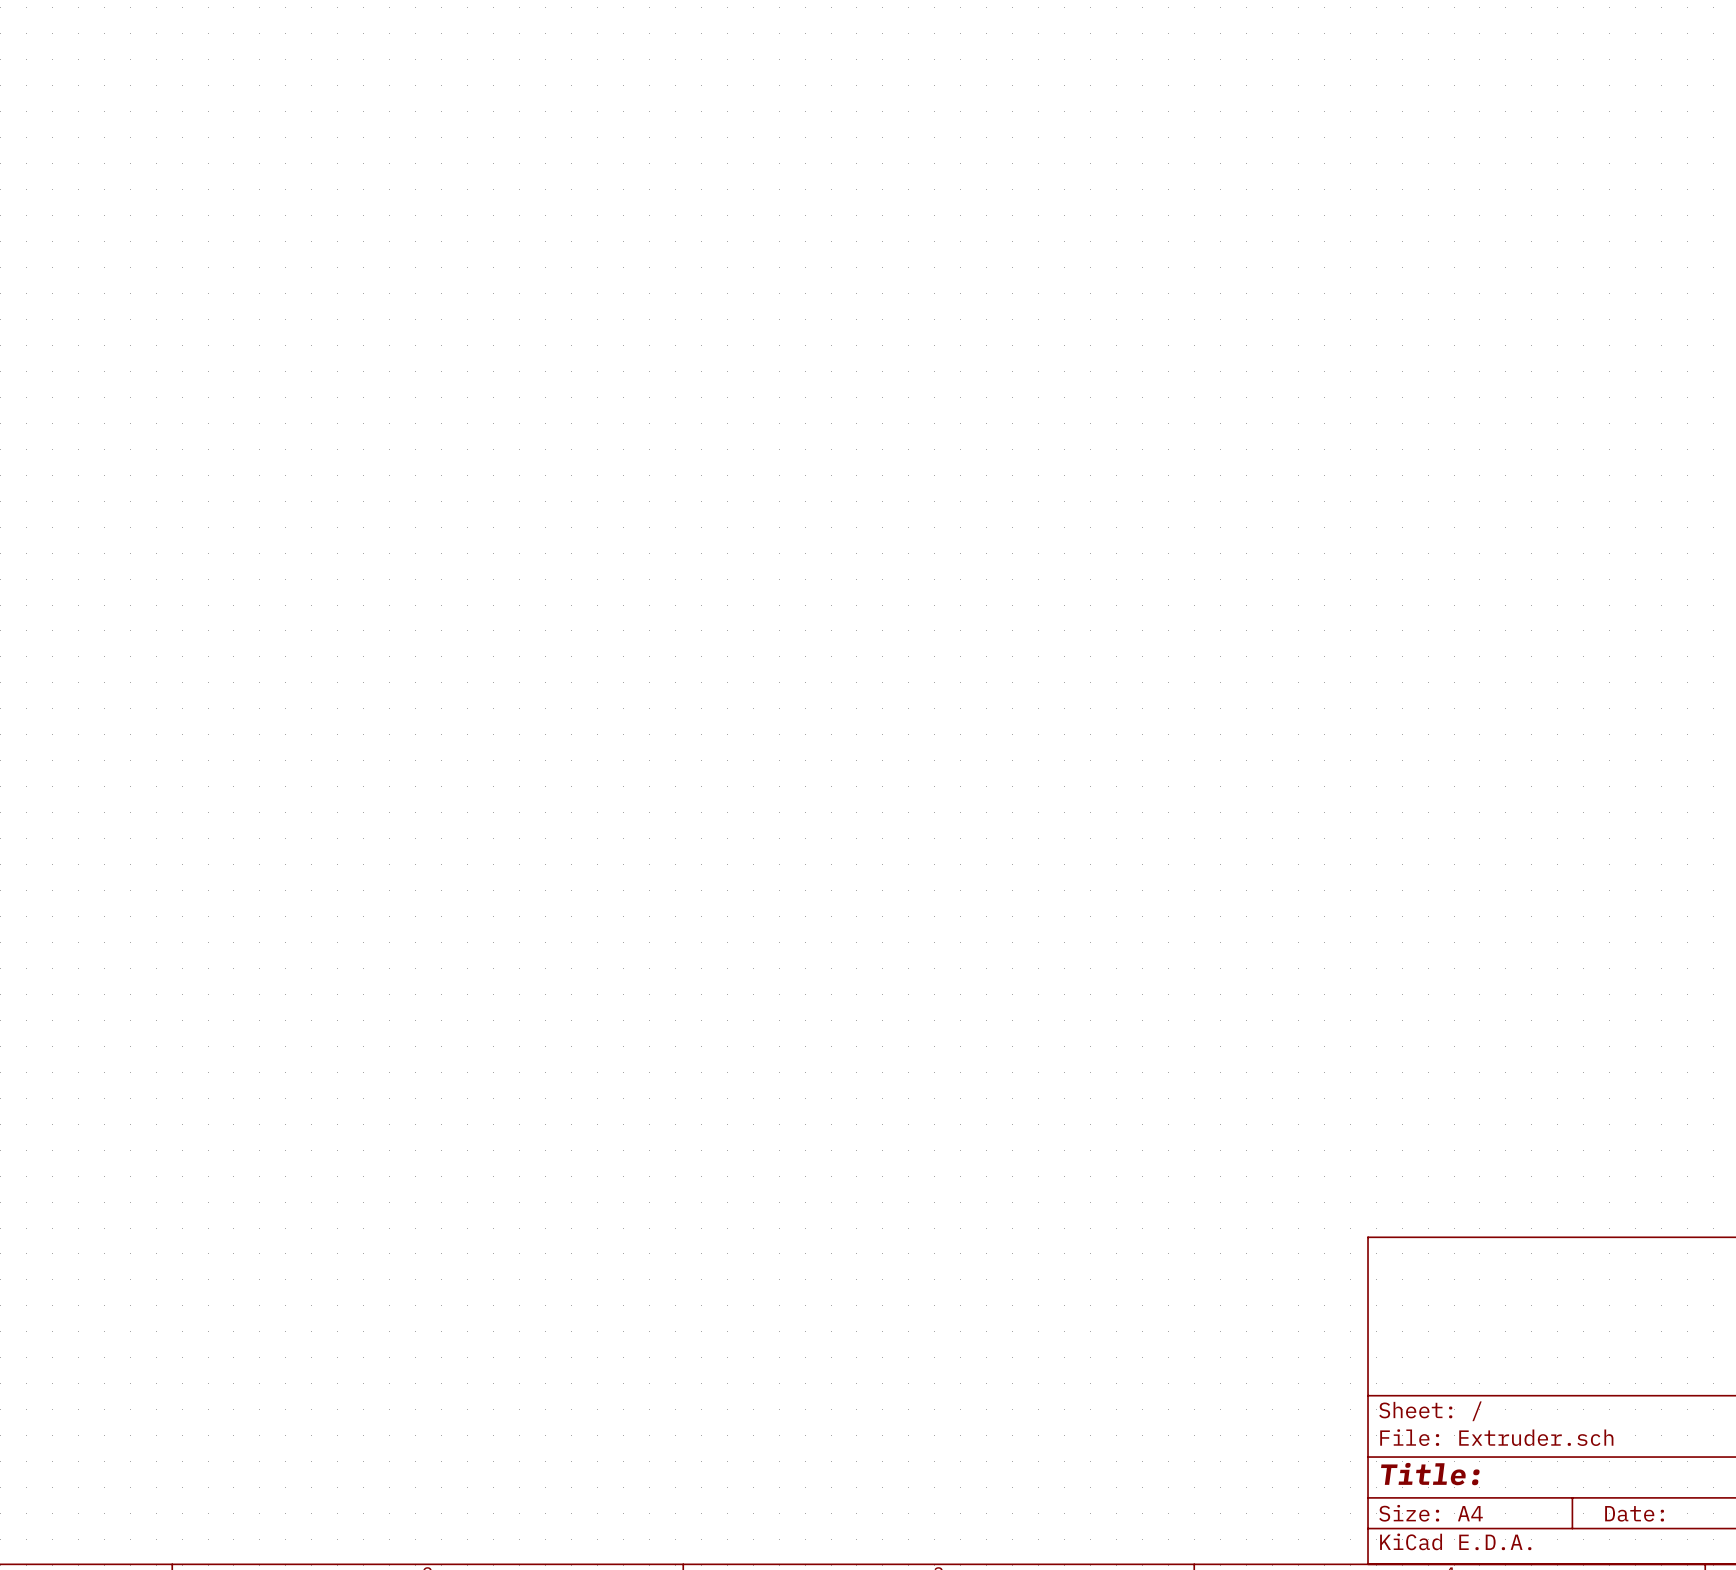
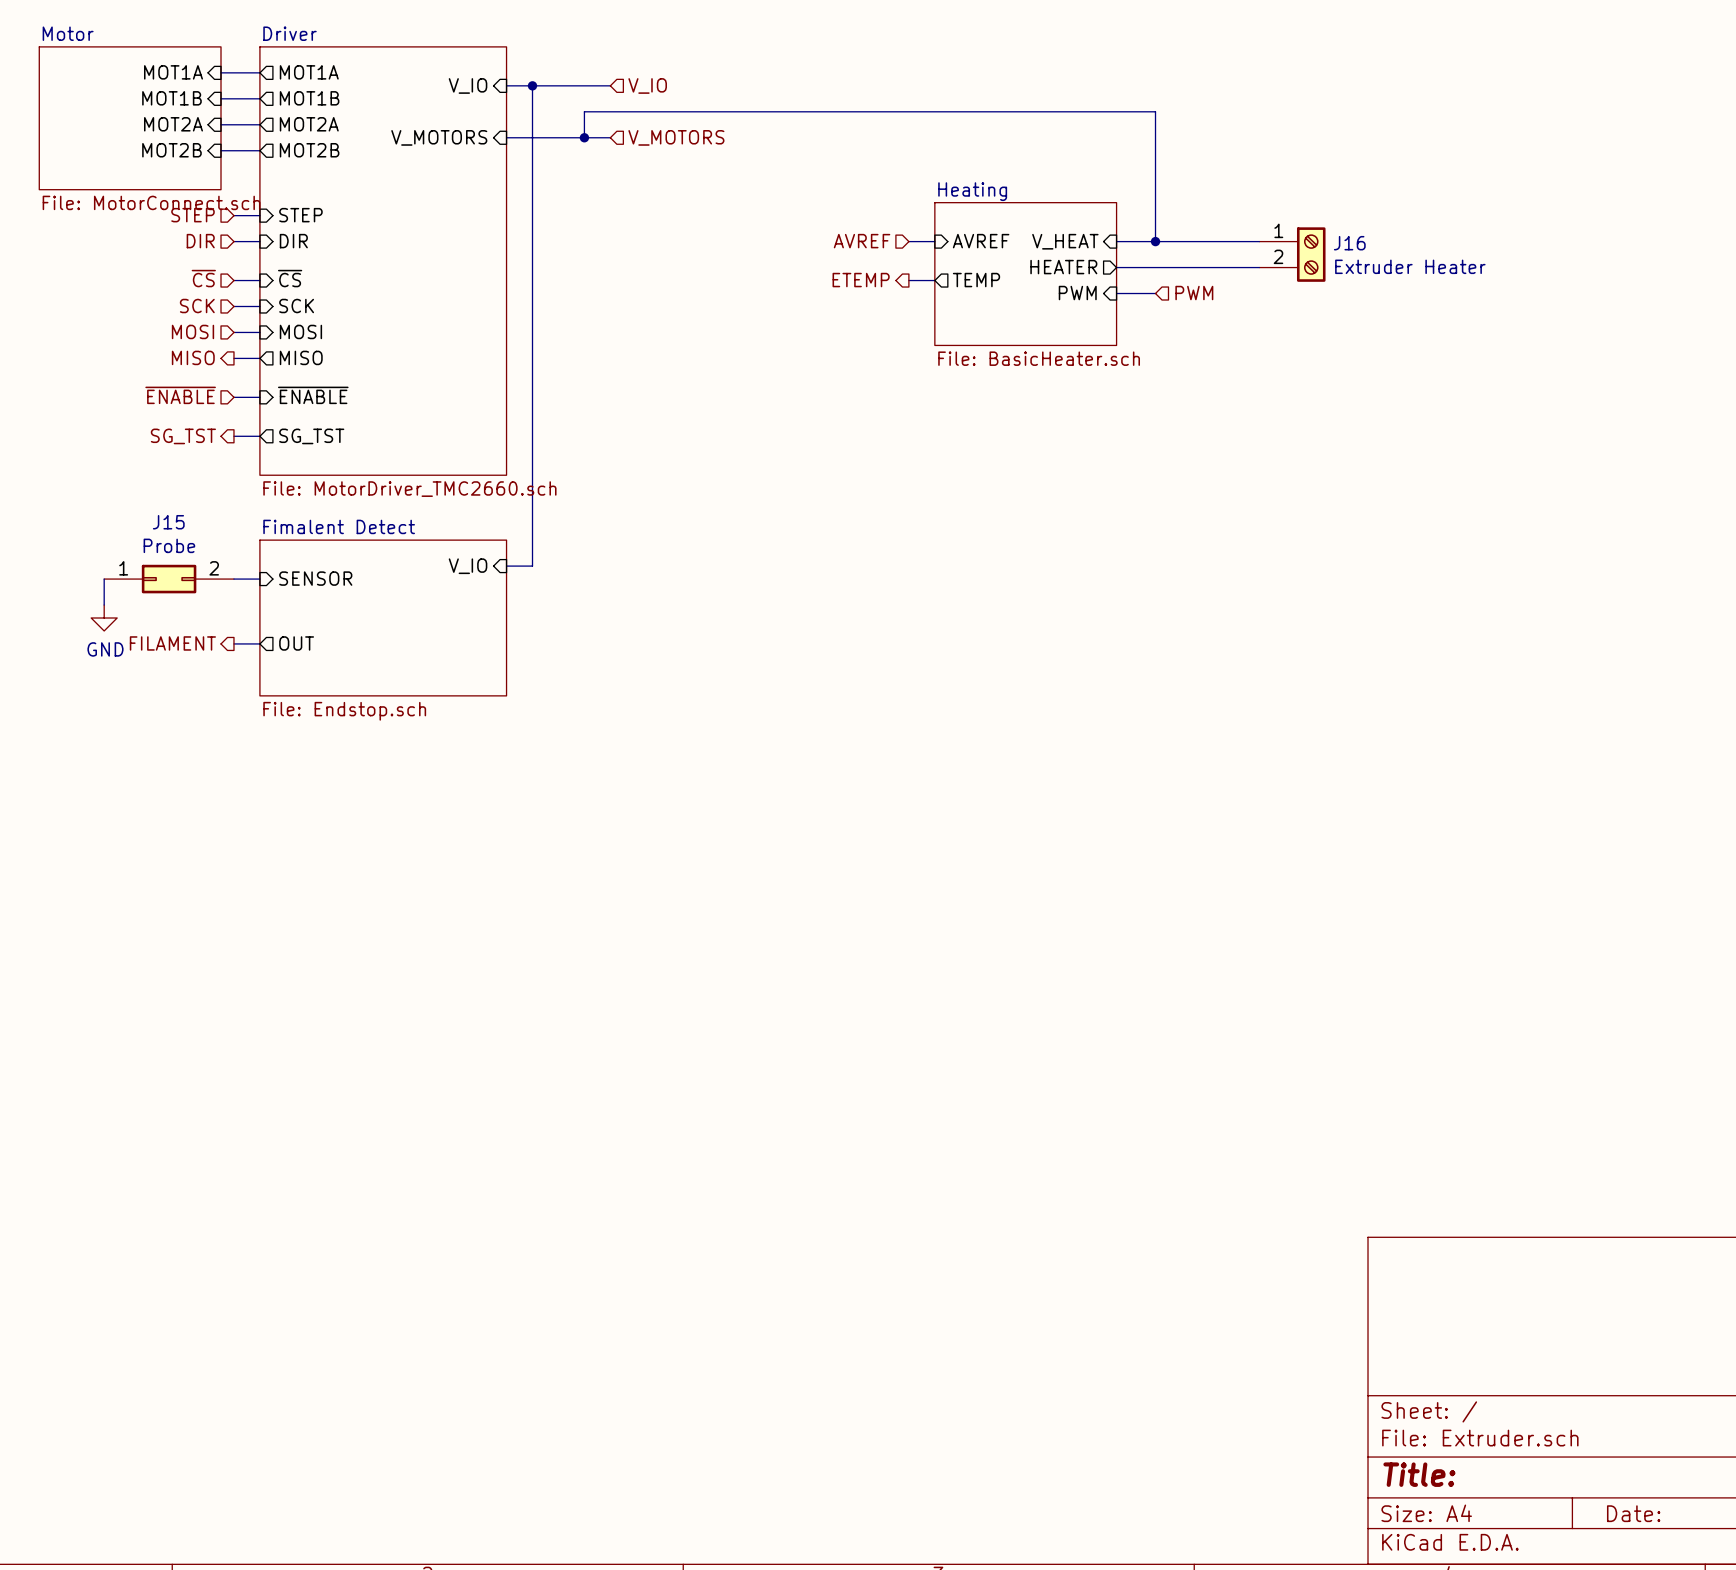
sheet pin: none -> MOT1A (173, 72)
wire: none -> (221, 72) (259, 72)
sheet pin: none -> MOT1A (309, 72)
wire: none -> (506, 85) (610, 85)
wire: none -> (532, 85) (532, 566) (506, 566)
junction: none -> (532, 85)
sheet pin: none -> V_IO (468, 85)
hierarchical label: none -> V_IO (647, 85)
sheet pin: none -> MOT1B (171, 98)
wire: none -> (221, 98) (259, 98)
sheet pin: none -> MOT1B (309, 98)
sheet Motor: none -> File: MotorConnect.sch (130, 118)
sheet pin: none -> MOT2A (173, 124)
wire: none -> (221, 124) (259, 124)
sheet pin: none -> MOT2A (309, 124)
wire: none -> (506, 137) (610, 137)
wire: none -> (584, 137) (584, 111) (1155, 111) (1155, 241)
junction: none -> (584, 137)
sheet pin: none -> V_MOTORS (439, 137)
hierarchical label: none -> V_MOTORS (676, 137)
sheet pin: none -> MOT2B (171, 150)
wire: none -> (221, 150) (259, 150)
sheet pin: none -> MOT2B (309, 150)
hierarchical label: none -> STEP (192, 215)
wire: none -> (233, 215) (259, 215)
sheet pin: none -> STEP (300, 215)
hierarchical label: none -> DIR (200, 241)
wire: none -> (233, 241) (259, 241)
sheet pin: none -> DIR (293, 241)
hierarchical label: none -> AVREF (862, 241)
wire: none -> (908, 241) (934, 241)
sheet pin: none -> AVREF (981, 241)
wire: none -> (1116, 241) (1259, 241)
junction: none -> (1155, 241)
sheet pin: none -> V_HEAT (1065, 241)
J16: none -> Extruder Heater (1292, 254)
sheet Driver: none -> File: MotorDriver_TMC2660.sch (383, 261)
sheet pin: none -> HEATER (1063, 267)
wire: none -> (1116, 267) (1259, 267)
sheet Heating: none -> File: BasicHeater.sch (1025, 274)
hierarchical label: none -> ~{CS} (203, 278)
sheet pin: none -> ~{CS} (290, 278)
wire: none -> (233, 280) (259, 280)
hierarchical label: none -> ETEMP (861, 280)
wire: none -> (908, 280) (934, 280)
sheet pin: none -> TEMP (976, 280)
sheet pin: none -> PWM (1077, 293)
wire: none -> (1116, 293) (1155, 293)
hierarchical label: none -> PWM (1194, 293)
hierarchical label: none -> SCK (197, 306)
wire: none -> (233, 306) (259, 306)
sheet pin: none -> SCK (296, 306)
hierarchical label: none -> MOSI (192, 331)
sheet pin: none -> MOSI (300, 331)
wire: none -> (233, 332) (259, 332)
hierarchical label: none -> MISO (193, 357)
sheet pin: none -> MISO (301, 357)
wire: none -> (233, 358) (259, 358)
hierarchical label: none -> ~{ENABLE} (180, 395)
sheet pin: none -> ~{ENABLE} (313, 395)
wire: none -> (233, 397) (259, 397)
wire: none -> (233, 436) (259, 436)
hierarchical label: none -> SG_TST (183, 436)
sheet pin: none -> SG_TST (311, 436)
sheet pin: none -> V_IO (468, 566)
sheet pin: none -> SENSOR (315, 578)
wire: none -> (104, 579) (104, 605)
J15: none -> Probe (169, 579)
wire: none -> (233, 579) (259, 579)
power symbol: none -> GND (104, 618)
sheet Fimalent Detect: none -> File: Endstop.sch (383, 618)
hierarchical label: none -> FILAMENT (172, 643)
wire: none -> (233, 643) (259, 643)
sheet pin: none -> OUT (296, 643)

